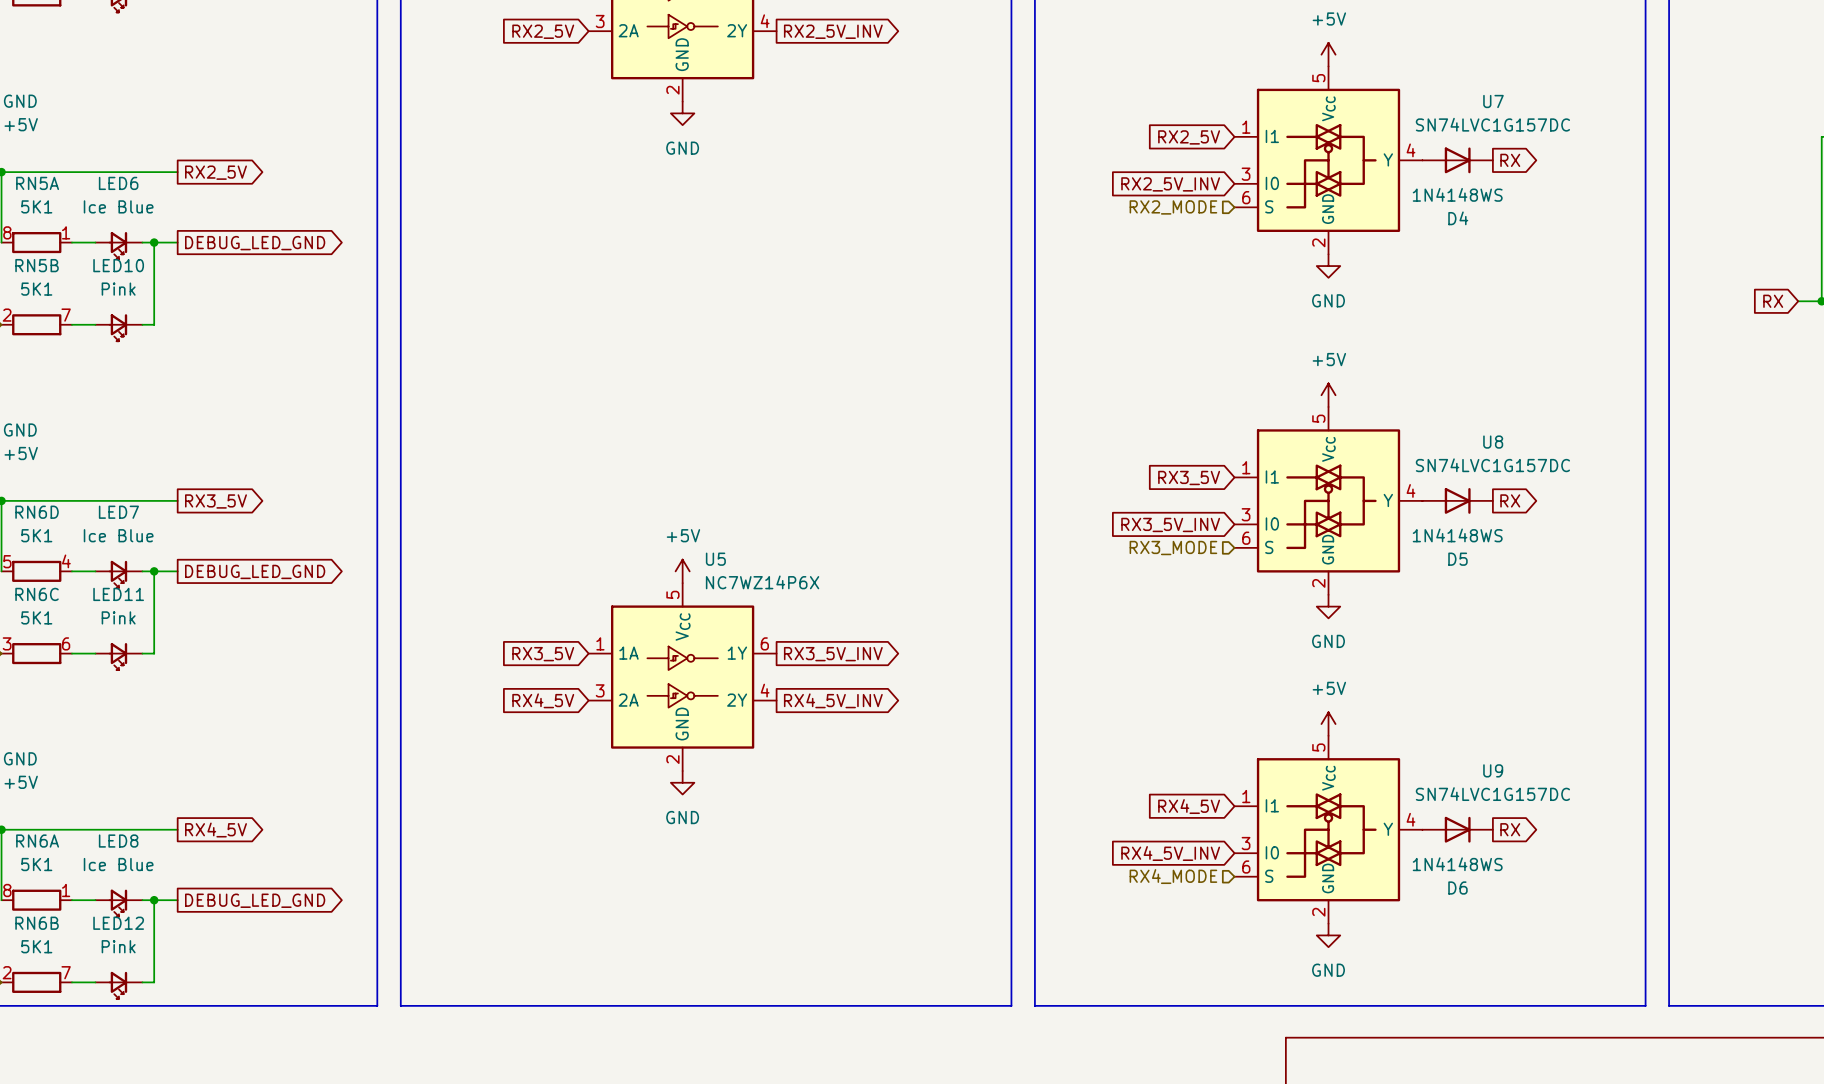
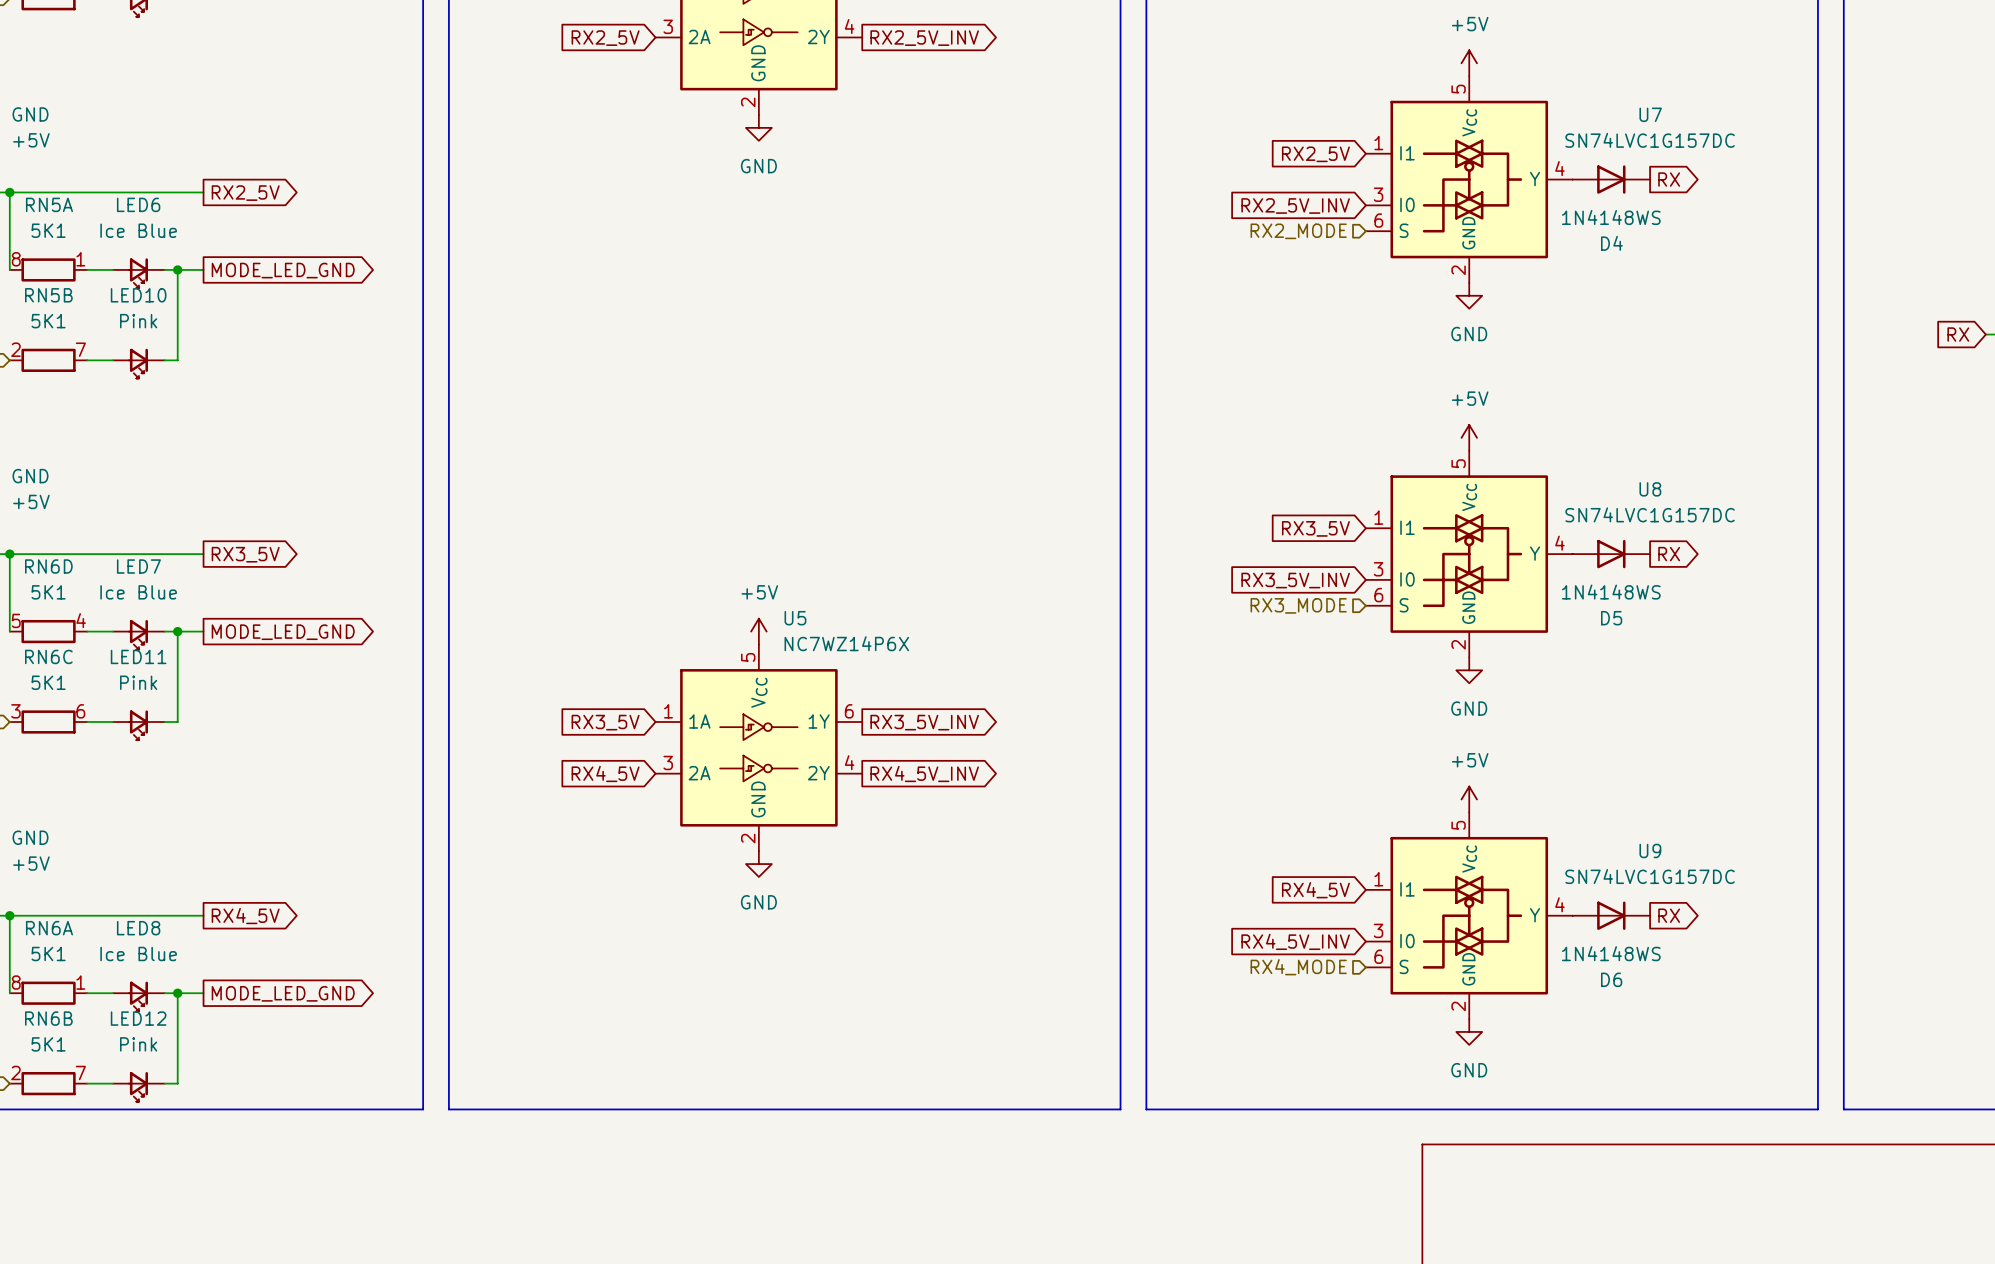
global label: DEBUG_LED_GND (255, 243) -> MODE_LED_GND (283, 270)
global label: DEBUG_LED_GND (255, 571) -> MODE_LED_GND (283, 632)
global label: DEBUG_LED_GND (255, 900) -> MODE_LED_GND (283, 993)

